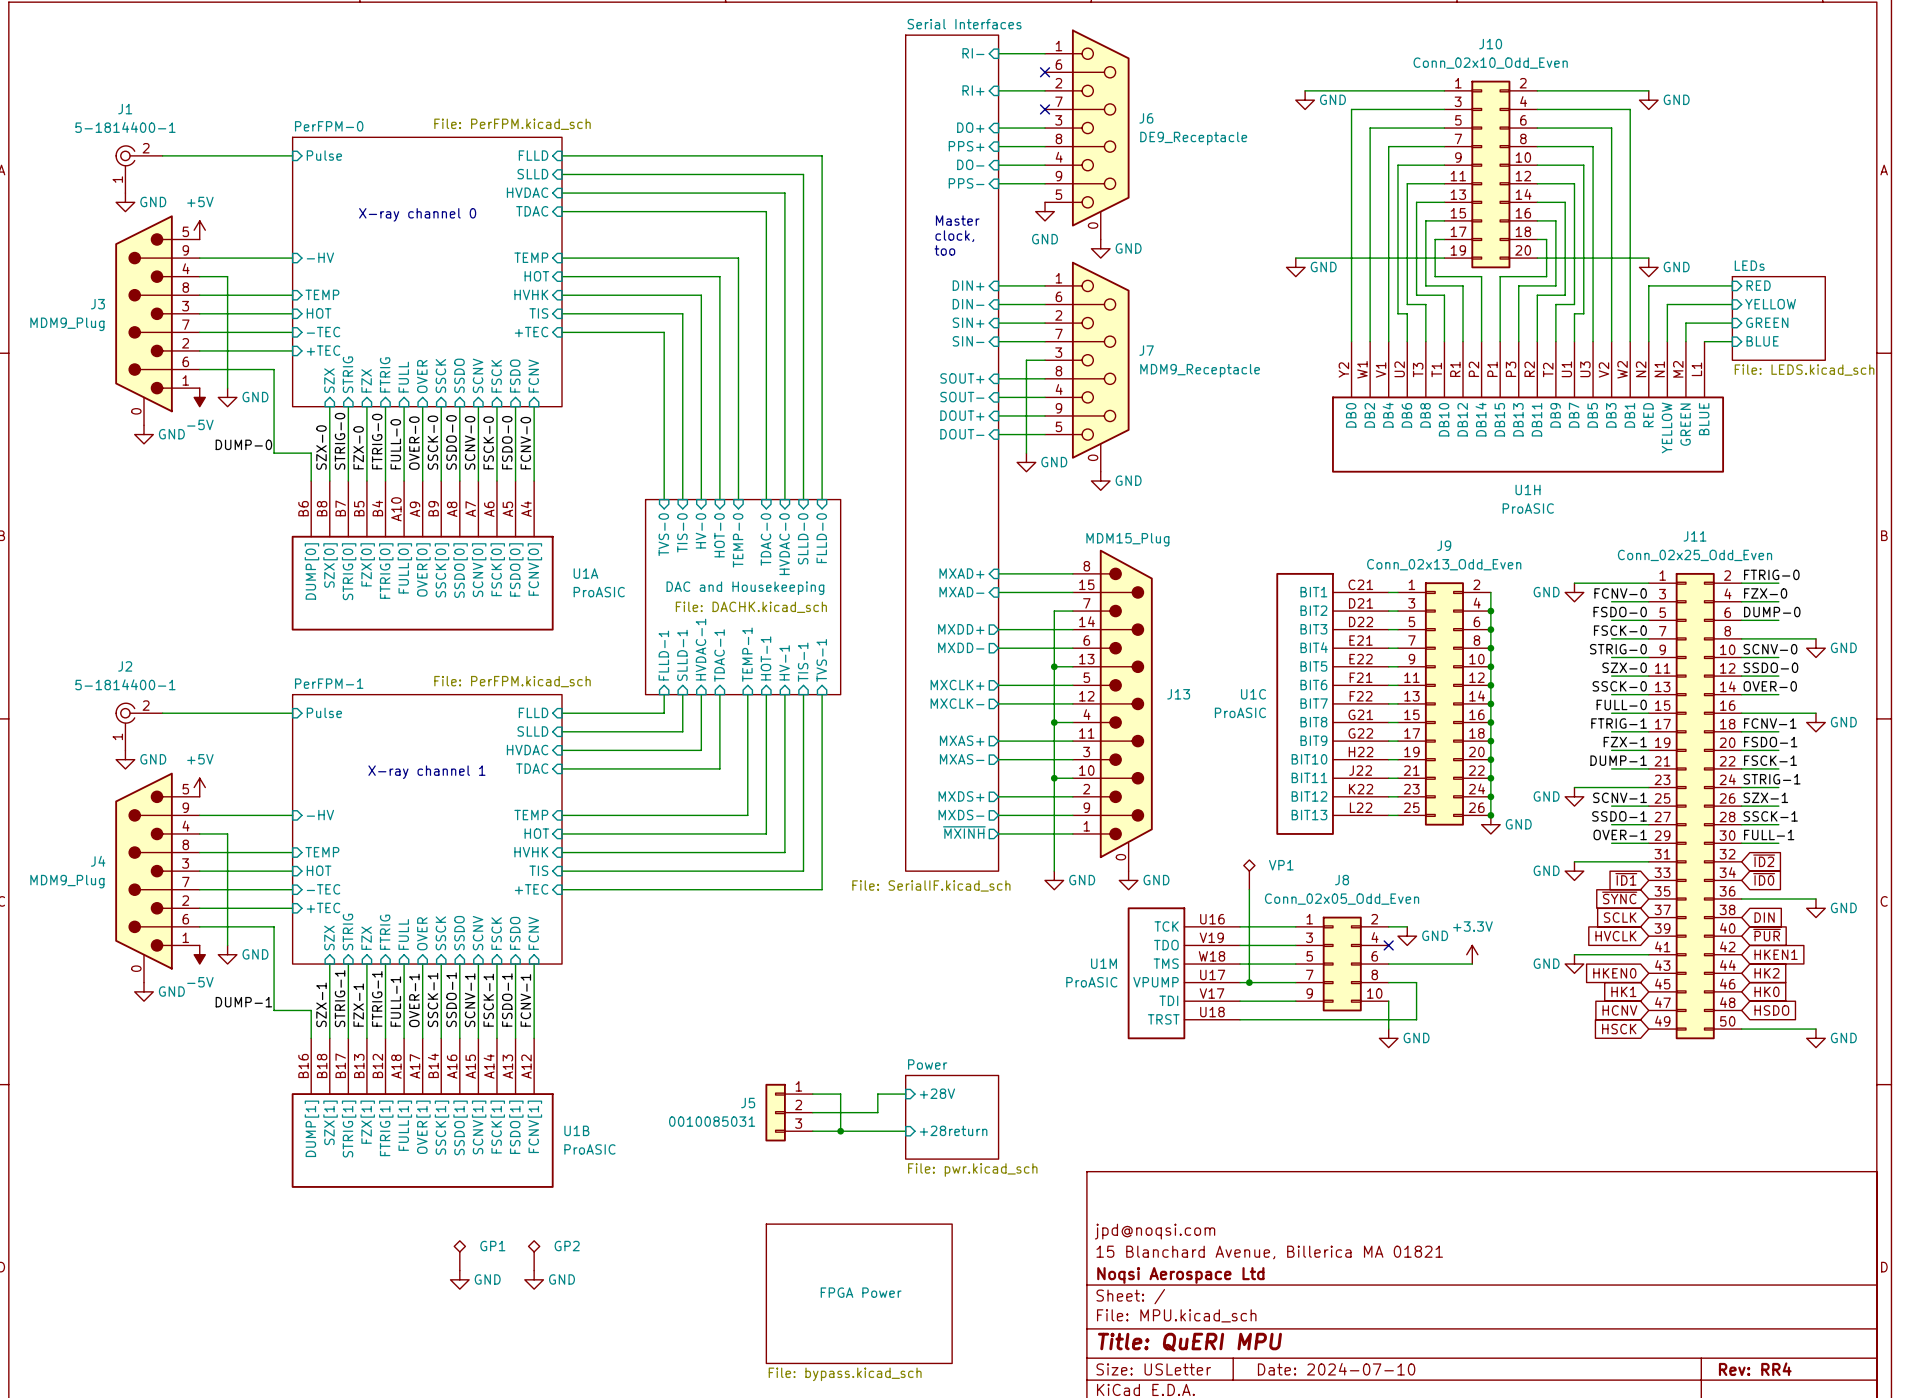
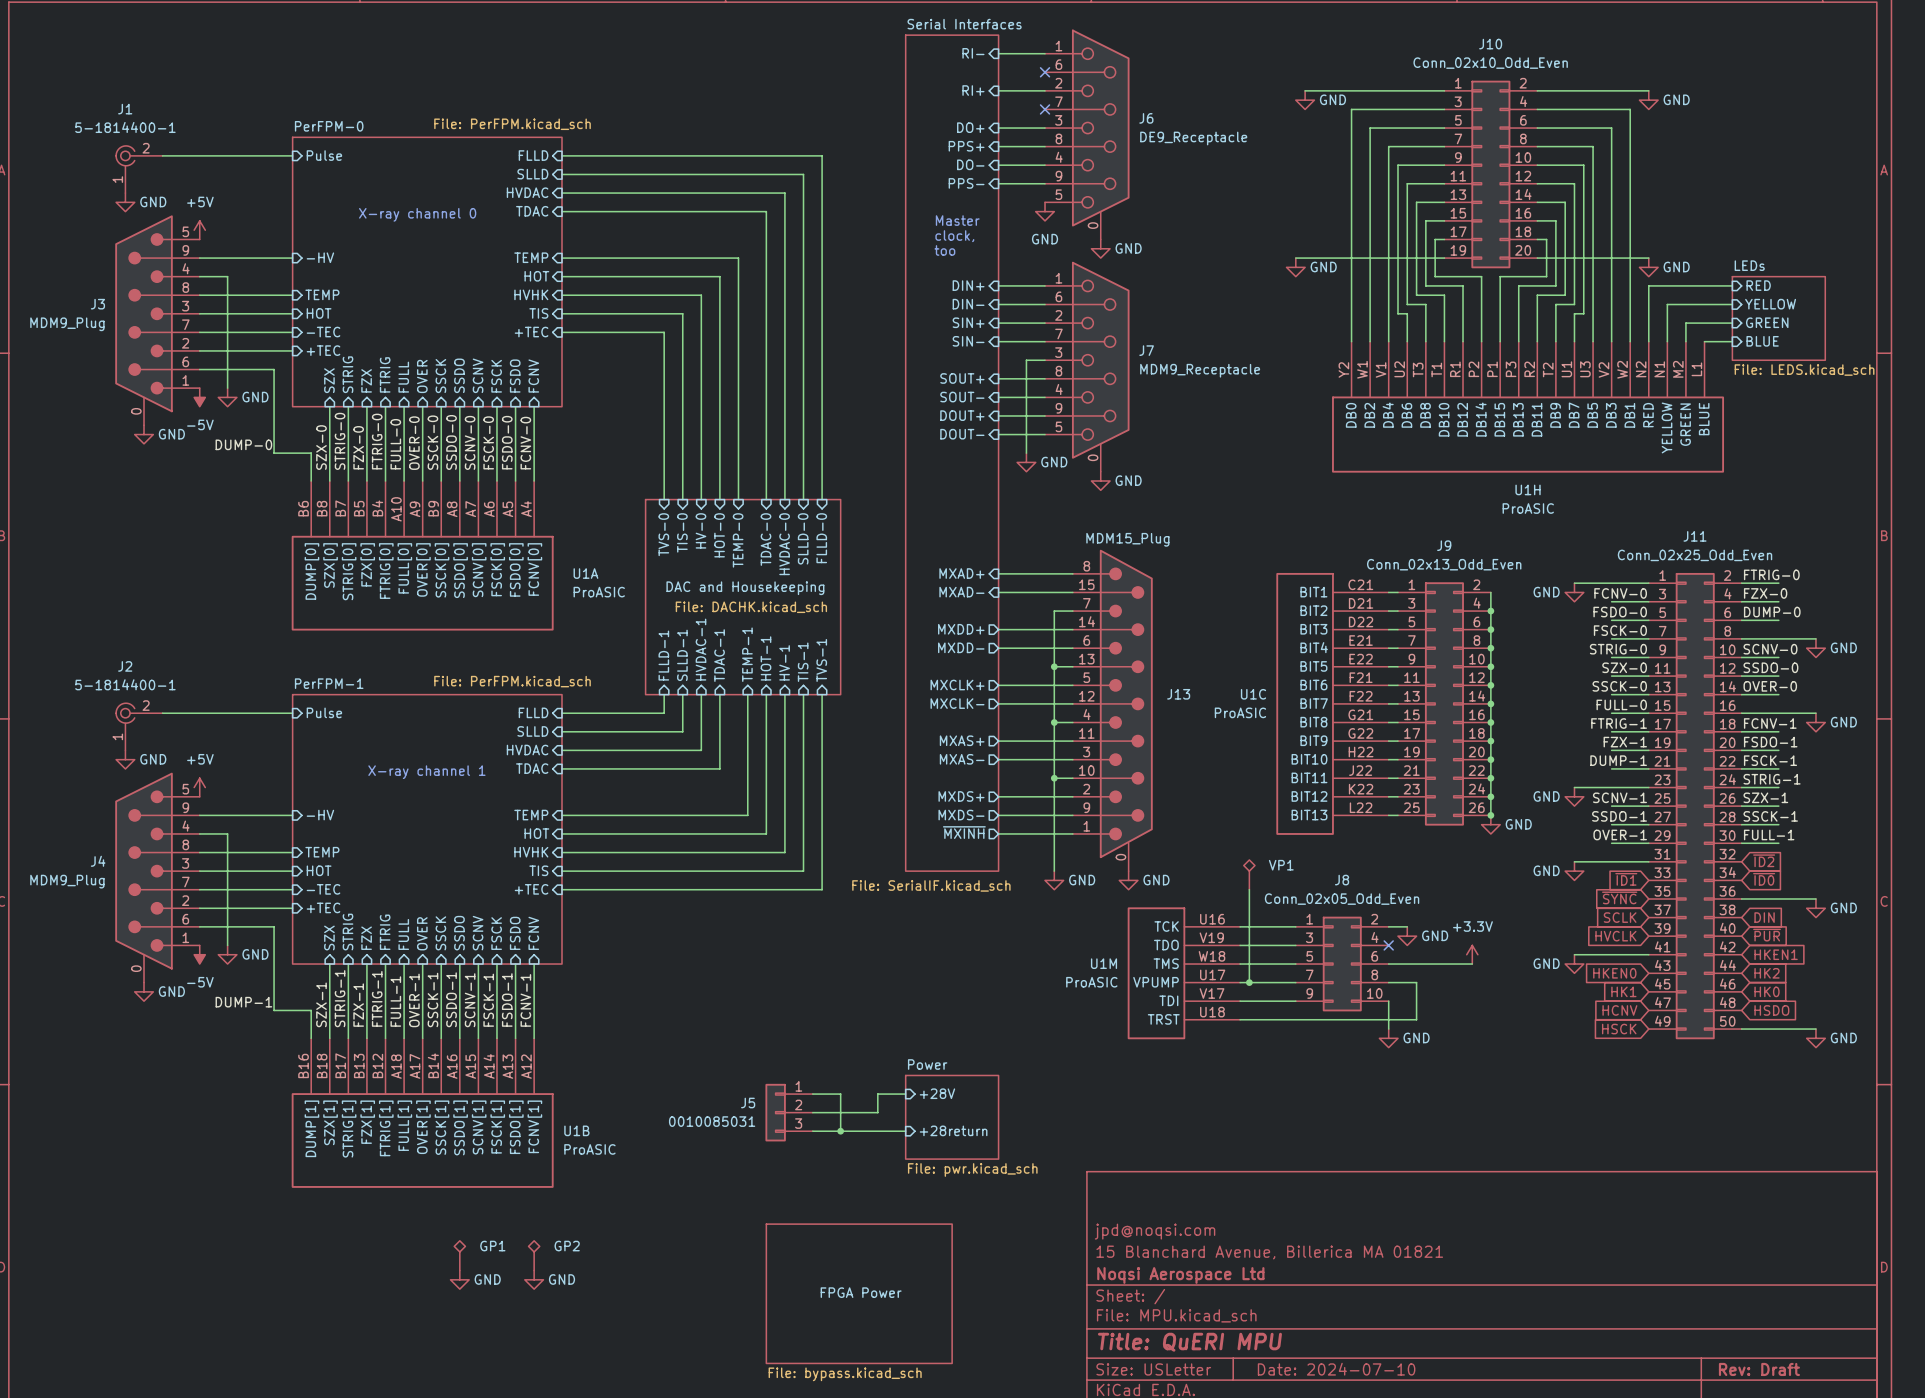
title block: Rev: RR4 (1755, 1369) -> Rev: Draft (1759, 1369)

